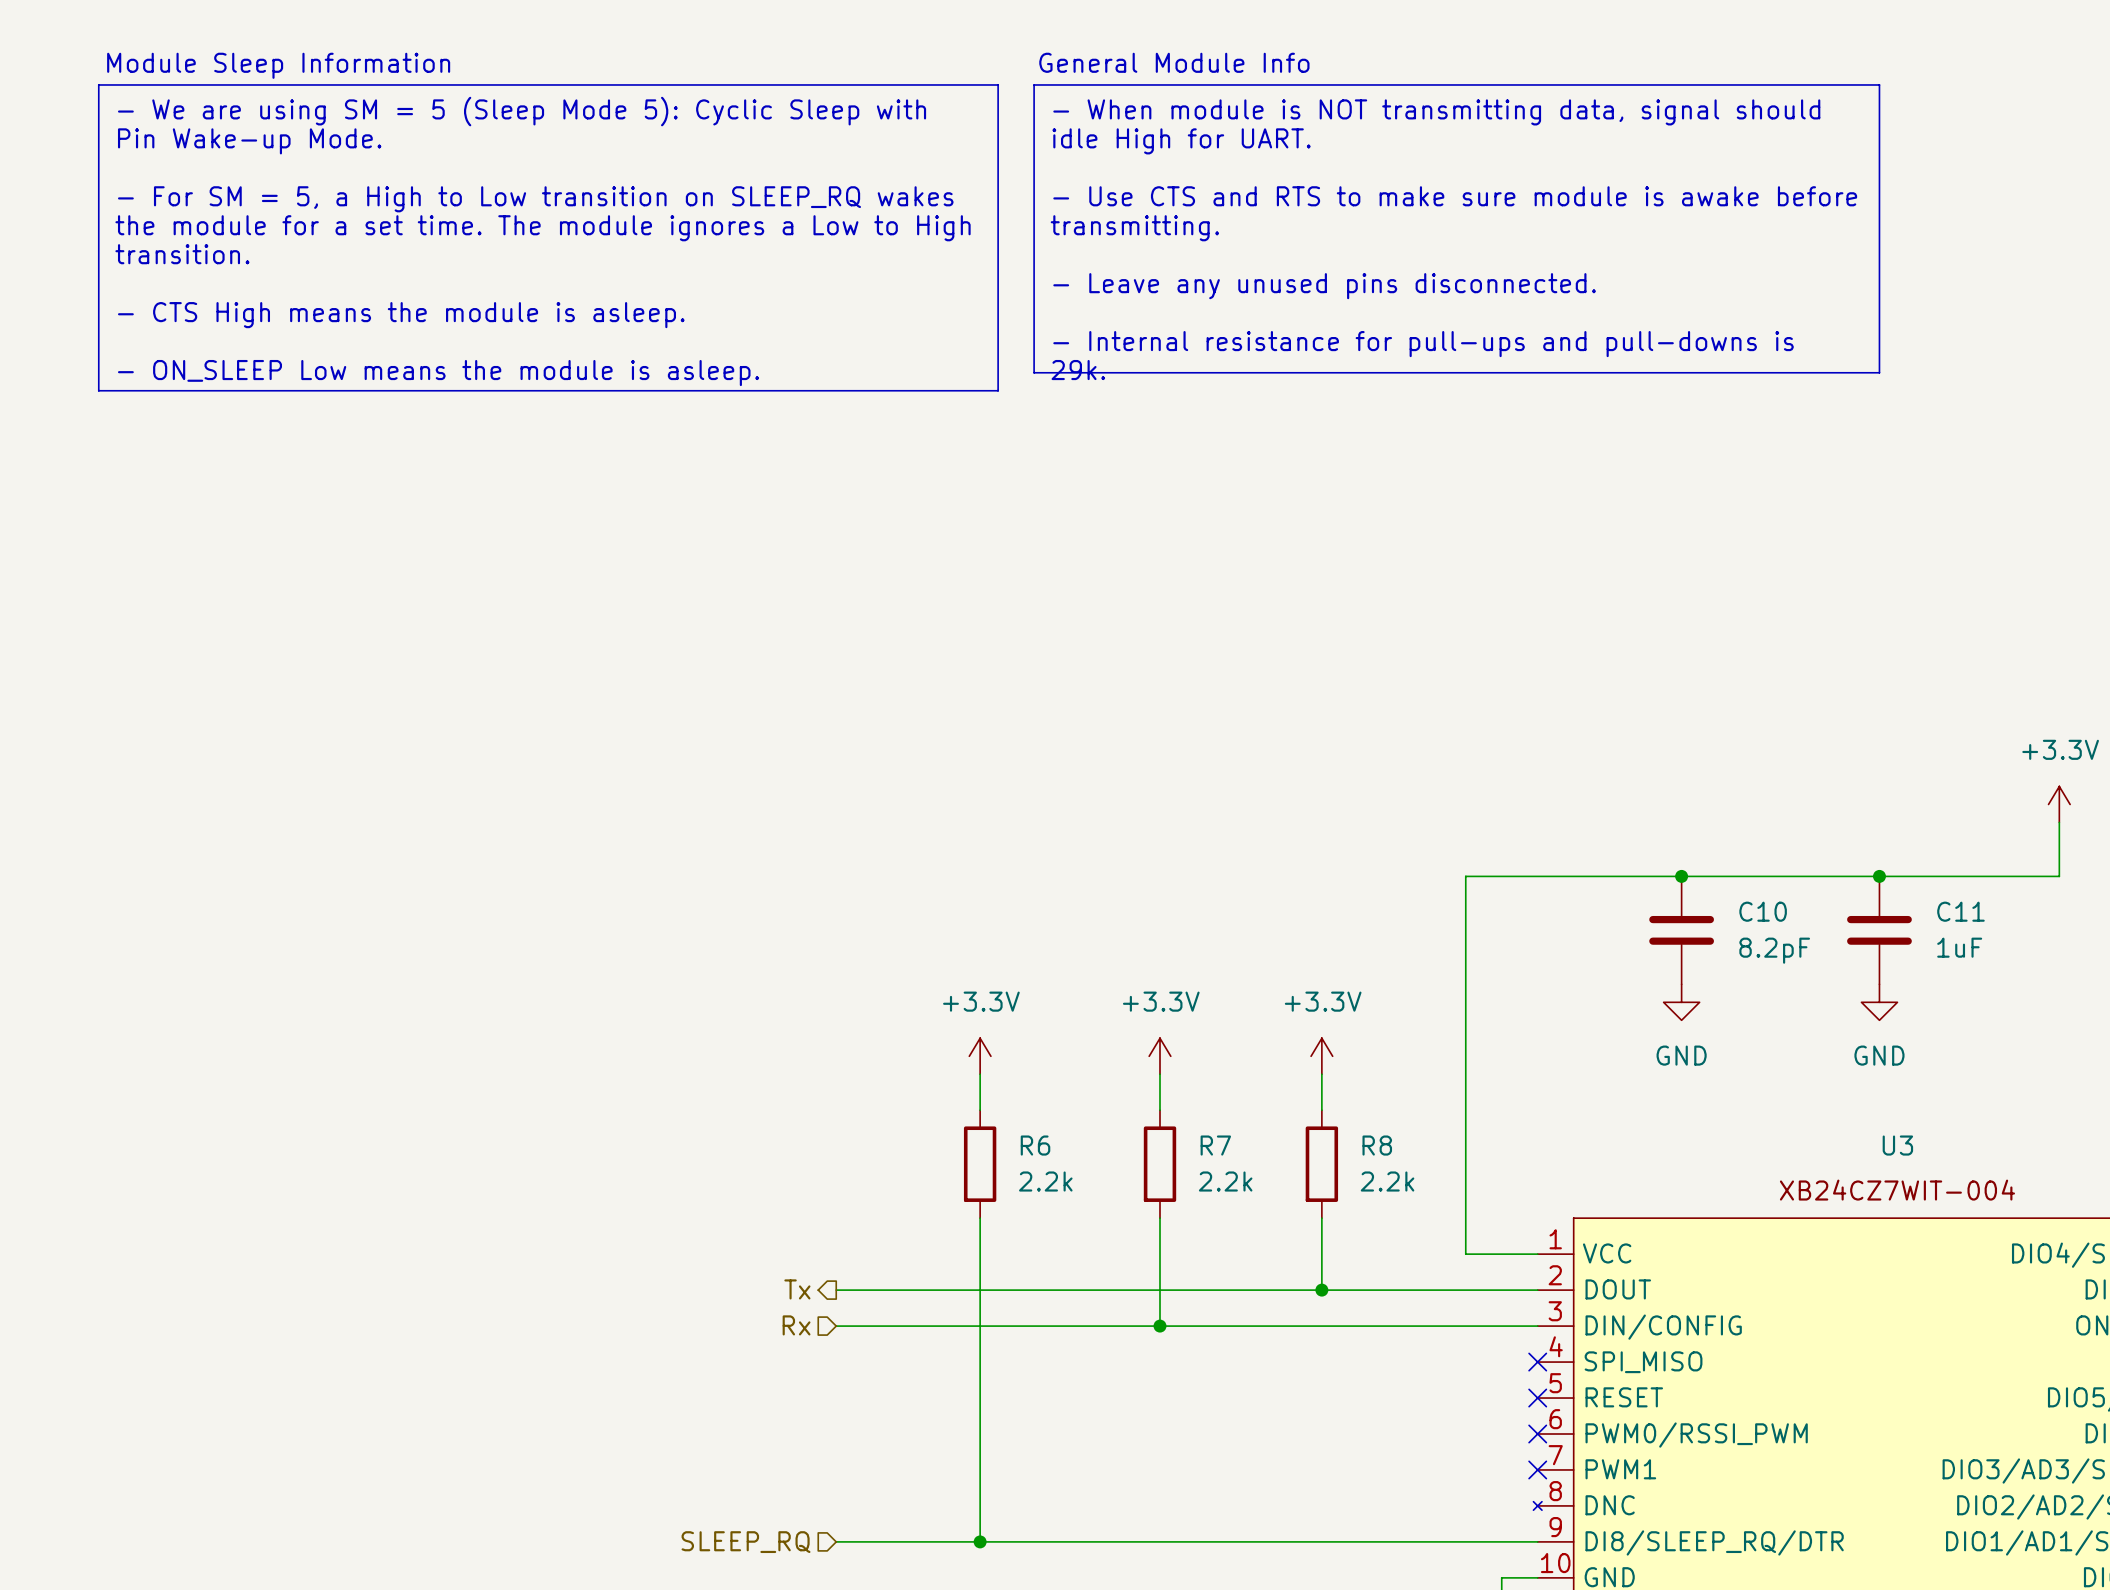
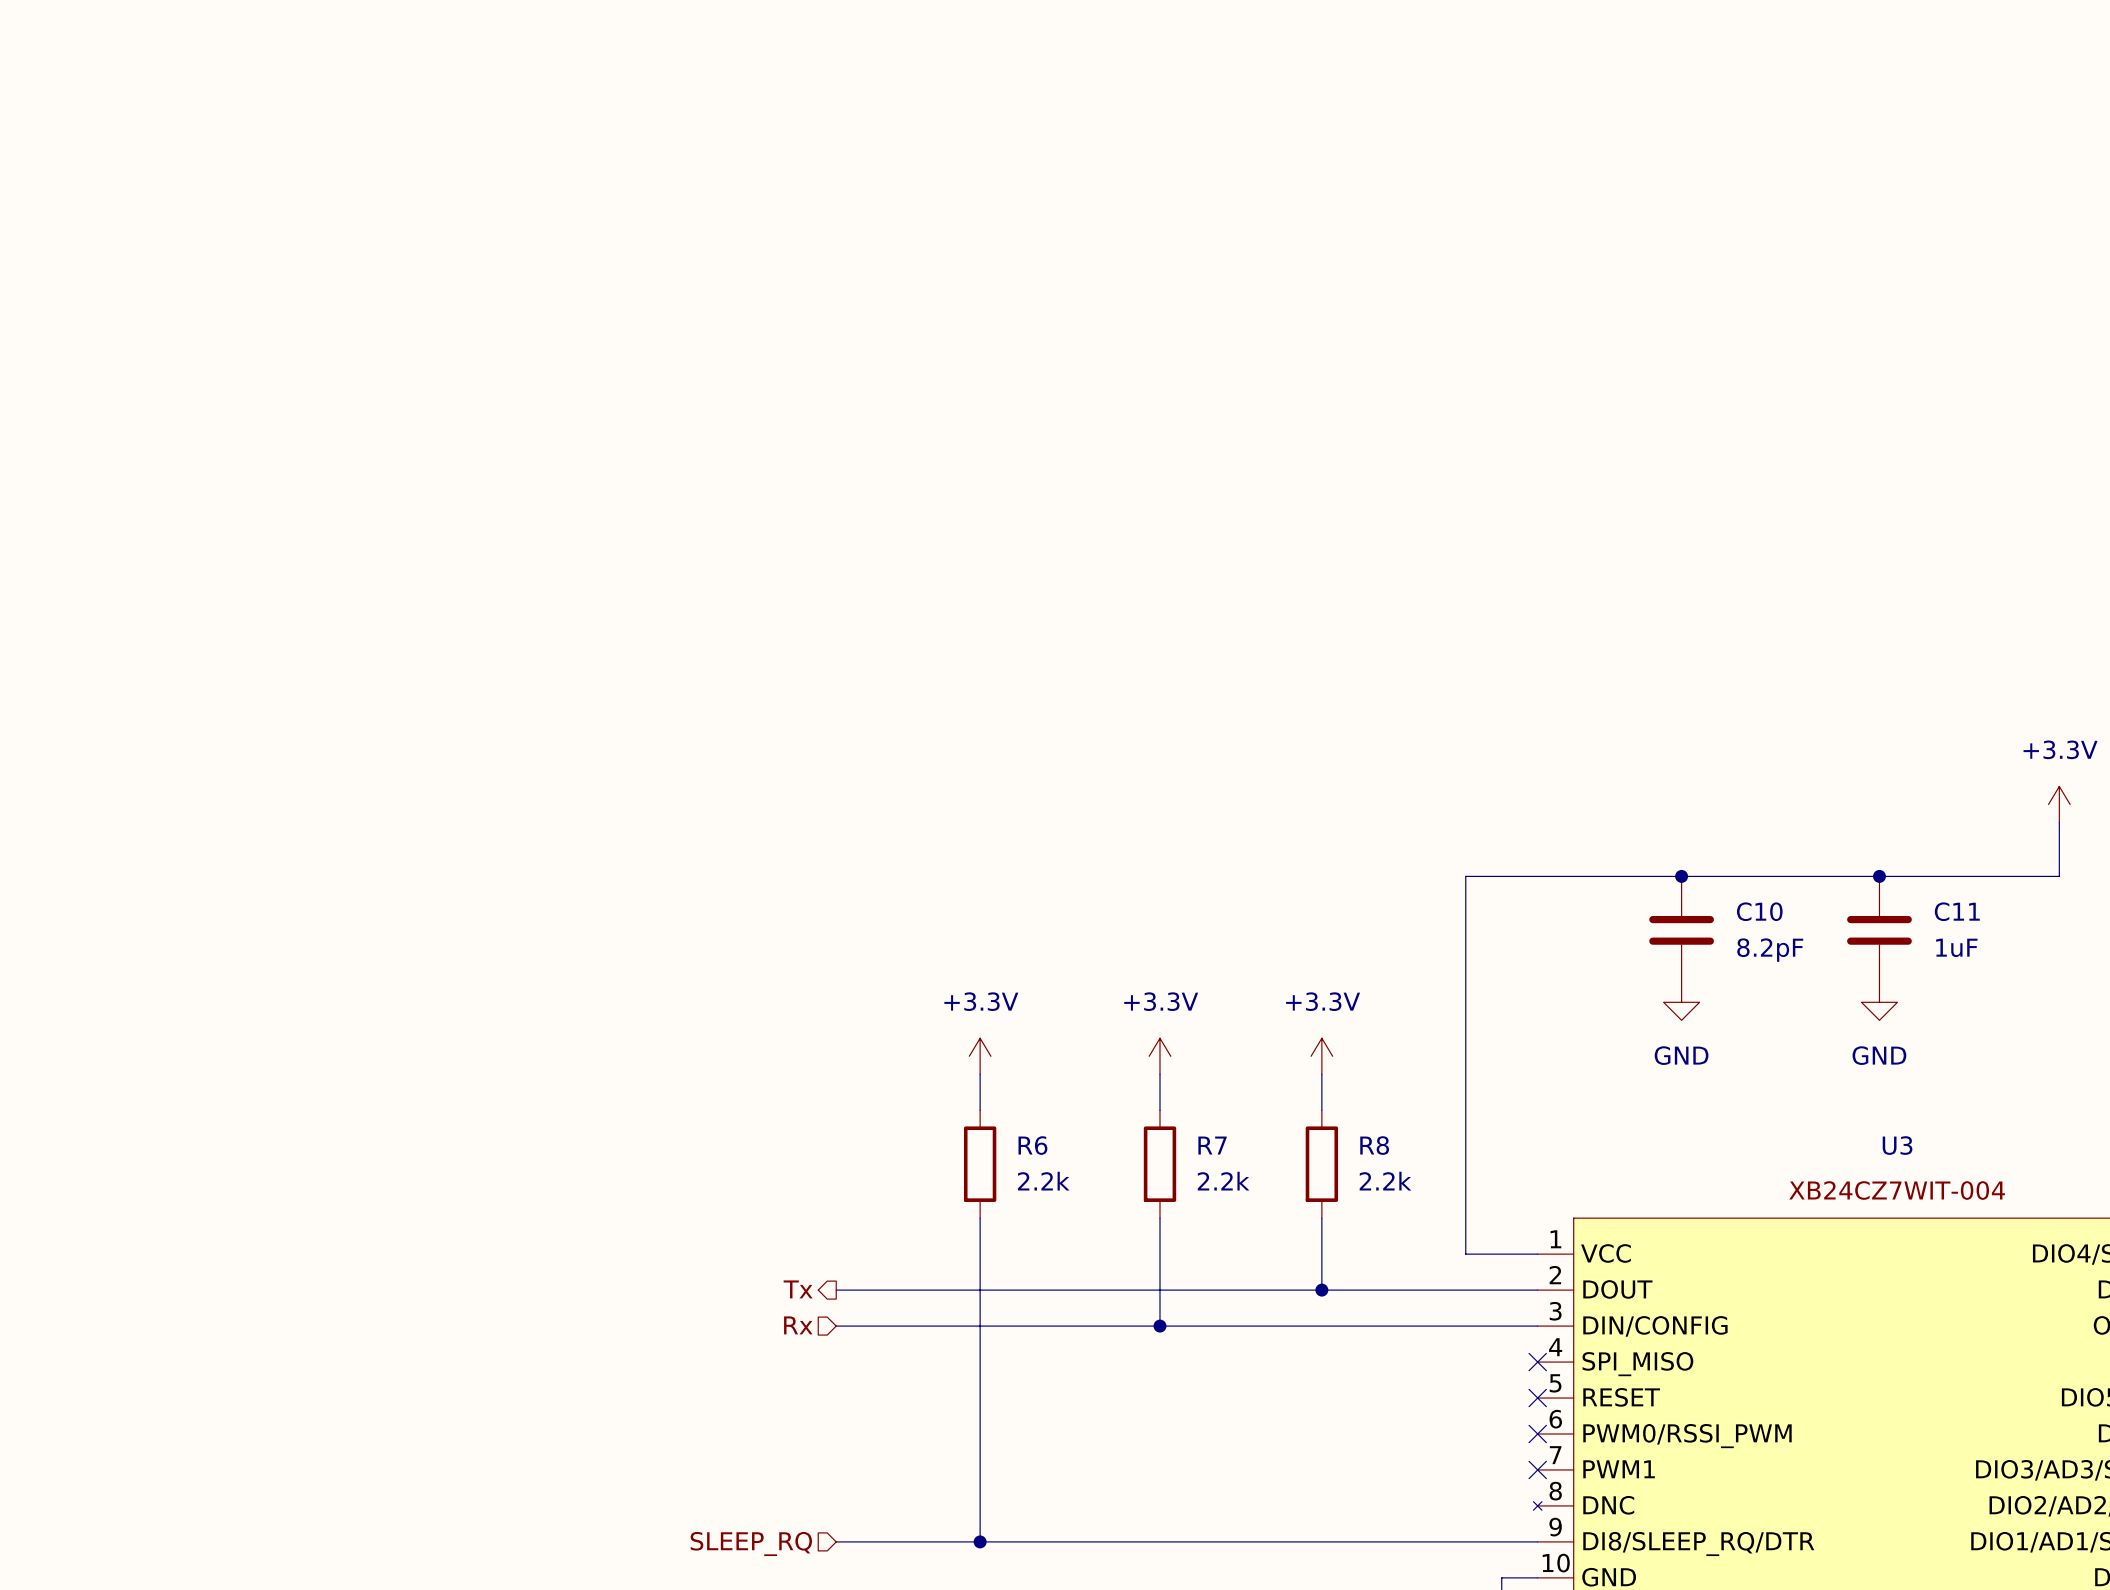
text: General Module Info (1174, 62) -> none
text: Module Sleep Information (278, 65) -> none
line: (98, 84) (998, 84) (998, 390) (98, 390) (98, 84) -> none
line: (1034, 84) (1879, 84) (1879, 372) (1034, 372) (1034, 84) -> none
text: - We are using SM = 5 (Sleep Mode 5): Cyclic Sleep with (522, 111) -> none
text: - When module is NOT transmitting data, signal should (1436, 112) -> none
text: Pin Wake-up Mode. (249, 141) -> none
text: idle High for UART. (1181, 141) -> none
text: - Use CTS and RTS to make sure module is awake before (1455, 196) -> none
text: - For SM = 5, a High to Low transition on SLEEP_RQ wakes (535, 199) -> none
text: the module for a set time. The module ignores a Low to High (543, 228) -> none
text: transmitting. (1134, 228) -> none
text: transition. (182, 254) -> none
text: - Leave any unused pins disconnected. (1324, 286) -> none
text: - CTS High means the module is asleep. (401, 315) -> none
text: - Internal resistance for pull-ups and pull-downs is (1423, 344) -> none
text: 29k. (1078, 370) -> none
text: - ON_SLEEP Low means the module is asleep. (438, 373) -> none

